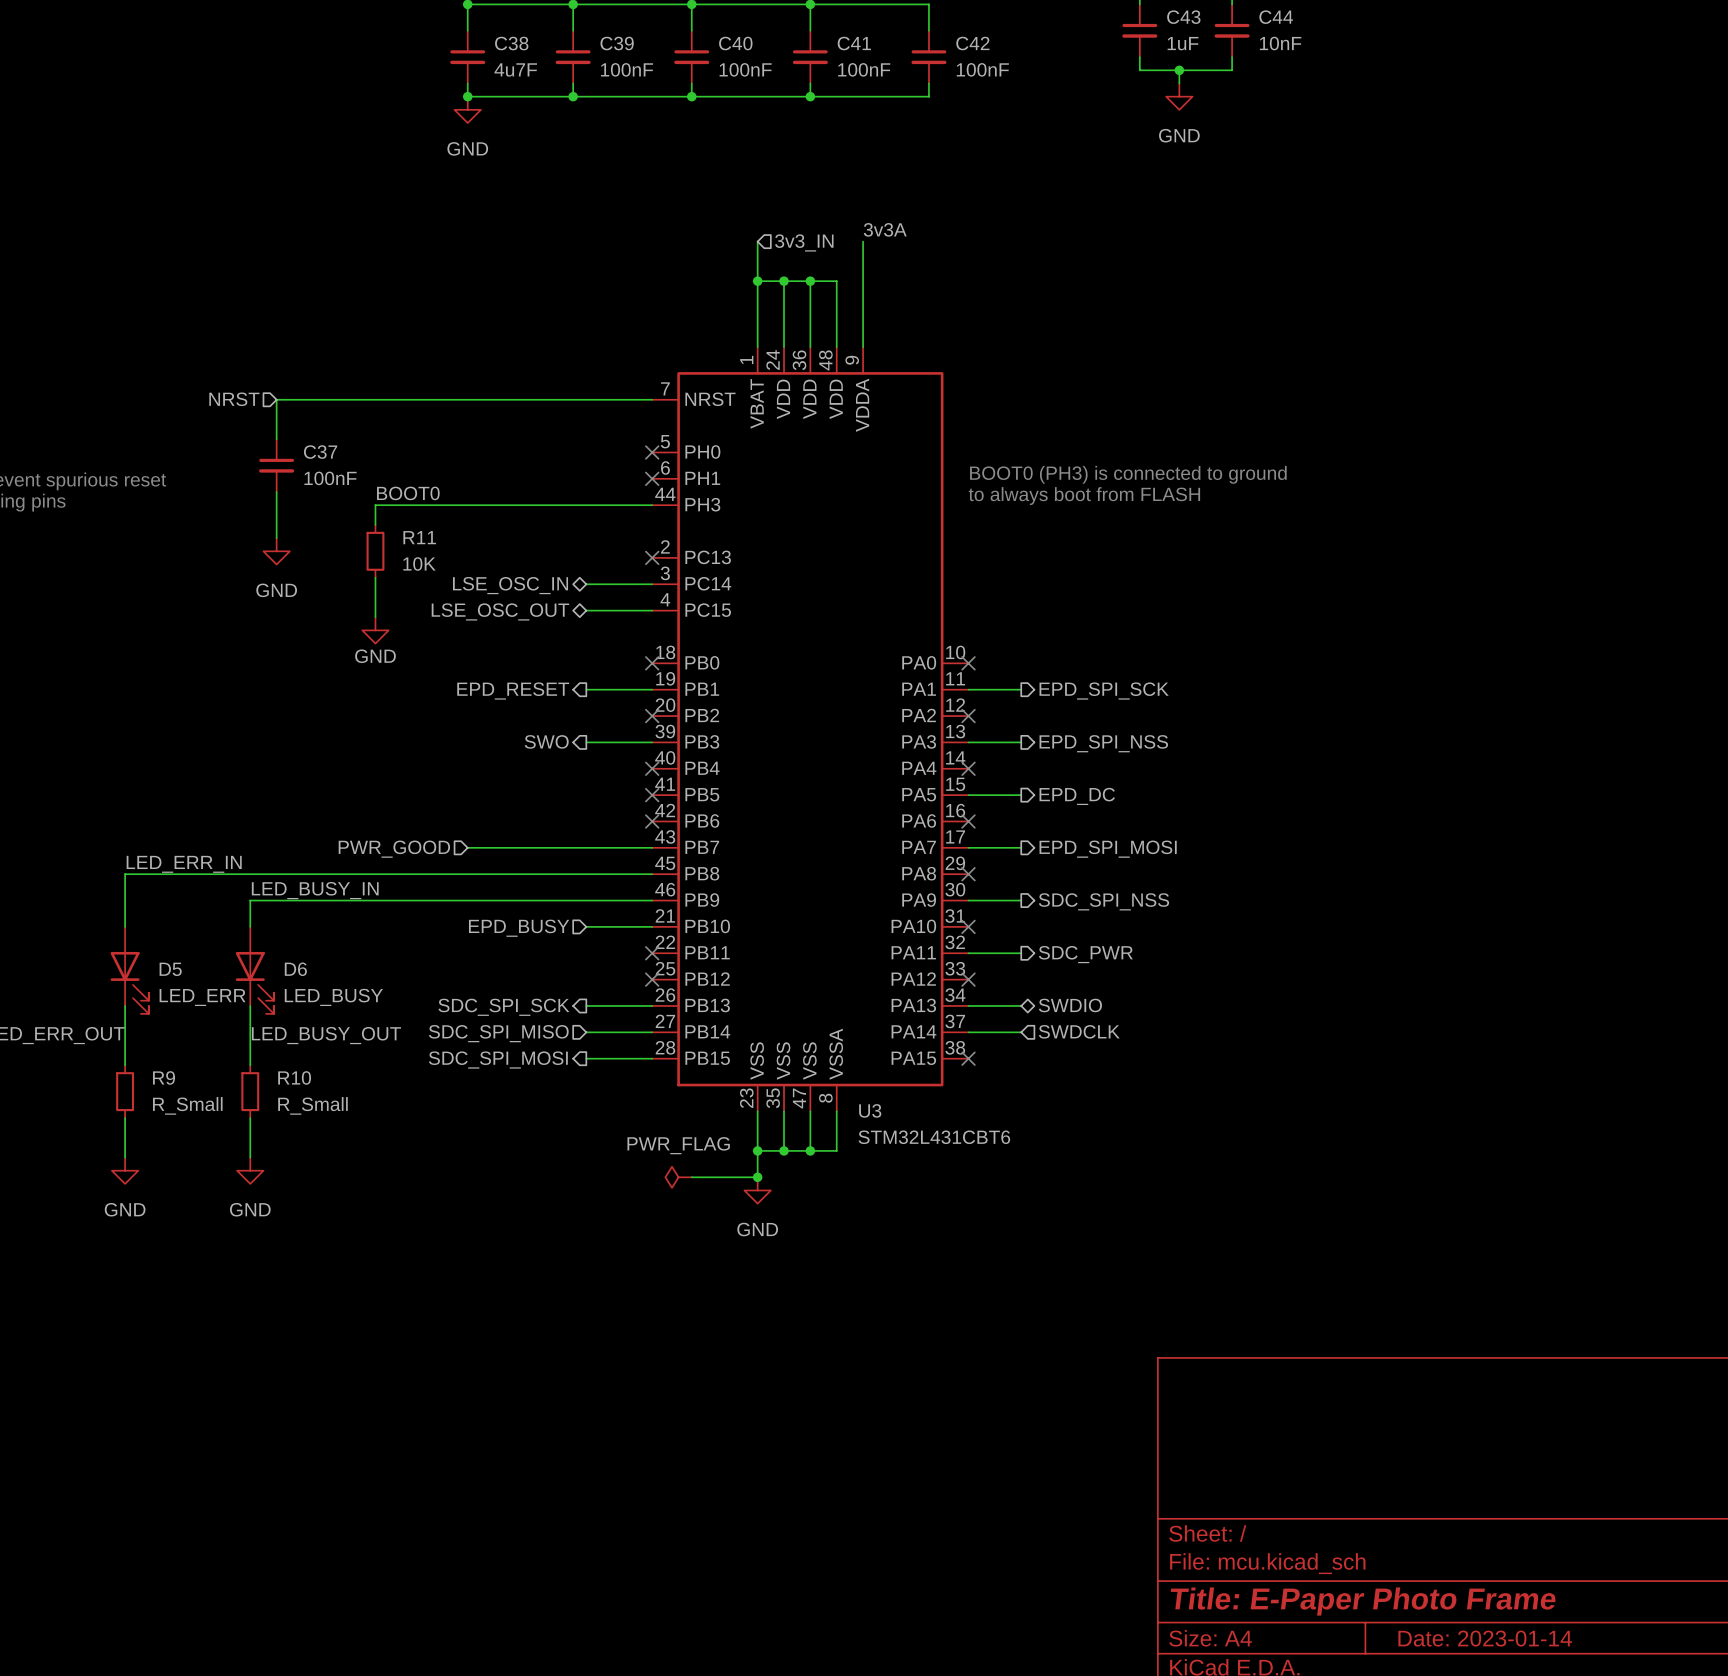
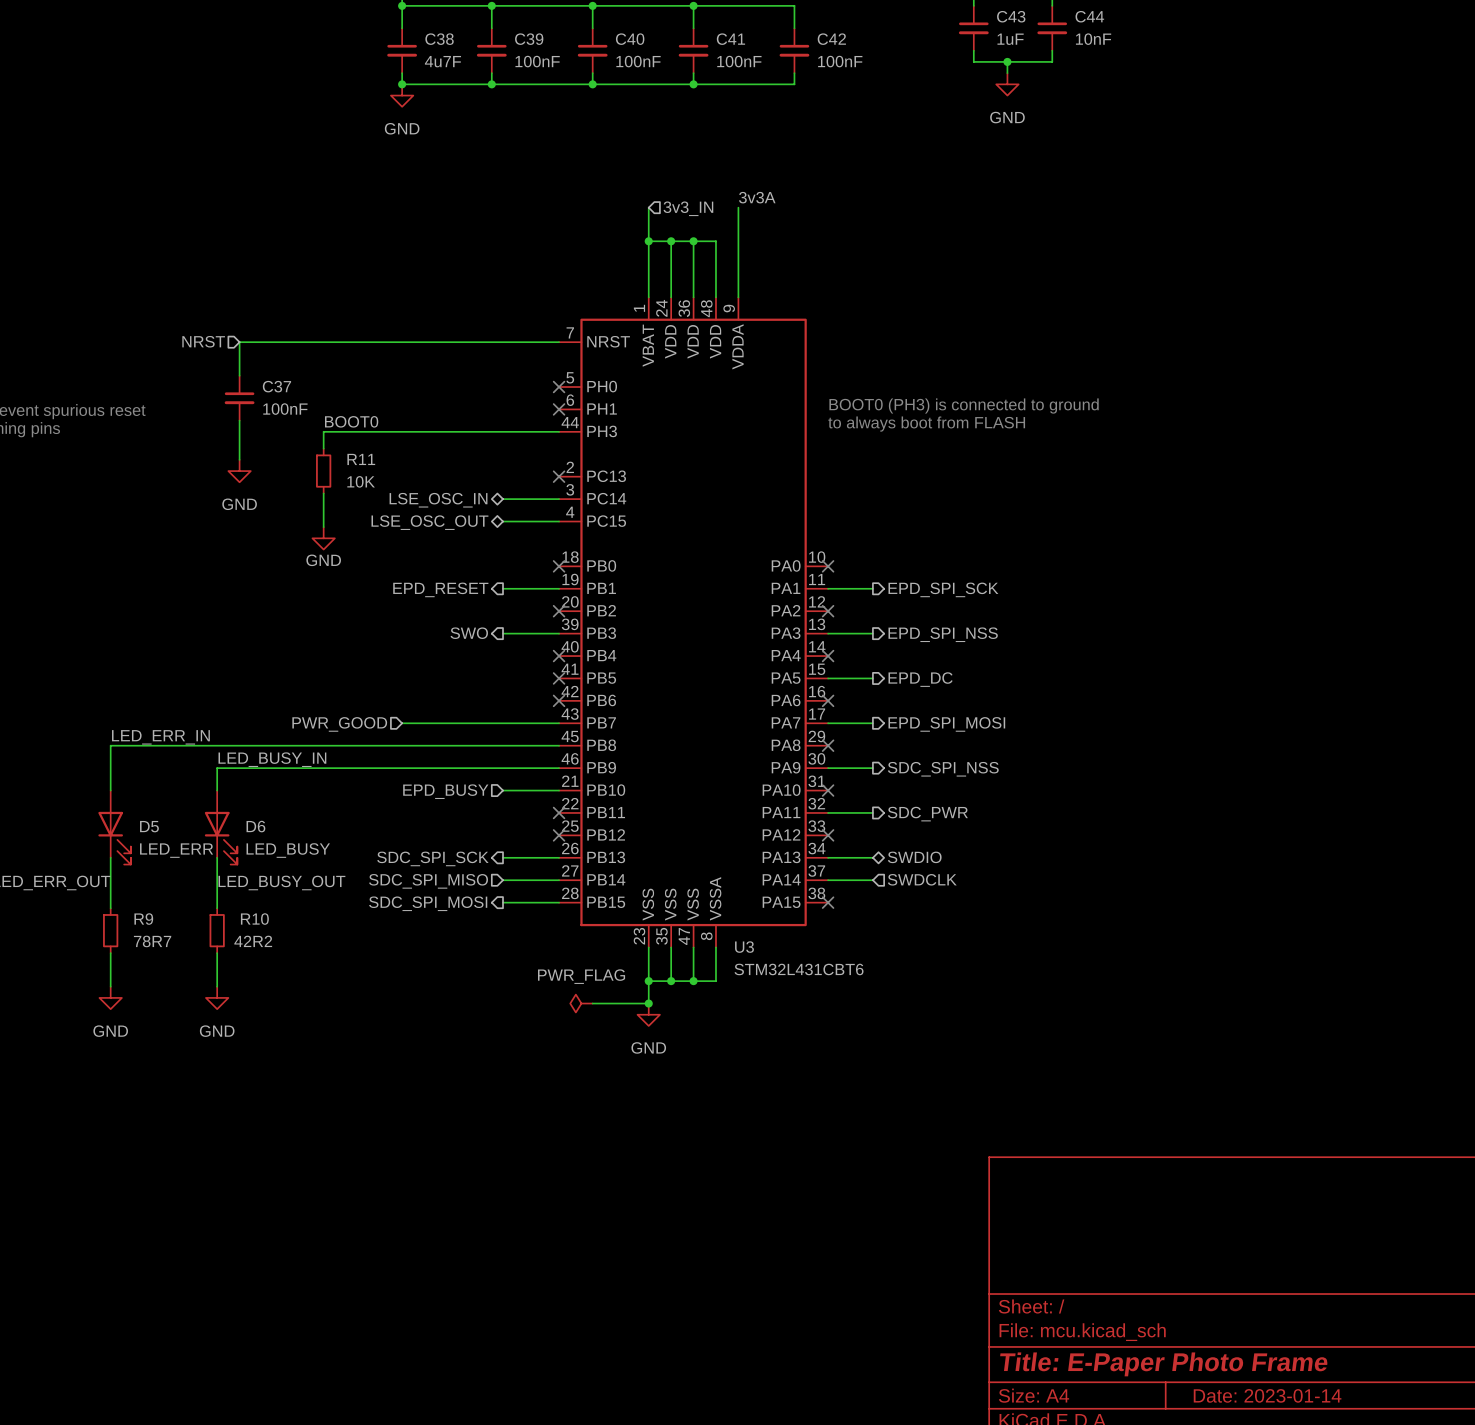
R9 value: R_Small (187, 1105) -> 78R7 (152, 941)
R10 value: R_Small (312, 1105) -> 42R2 (253, 941)

